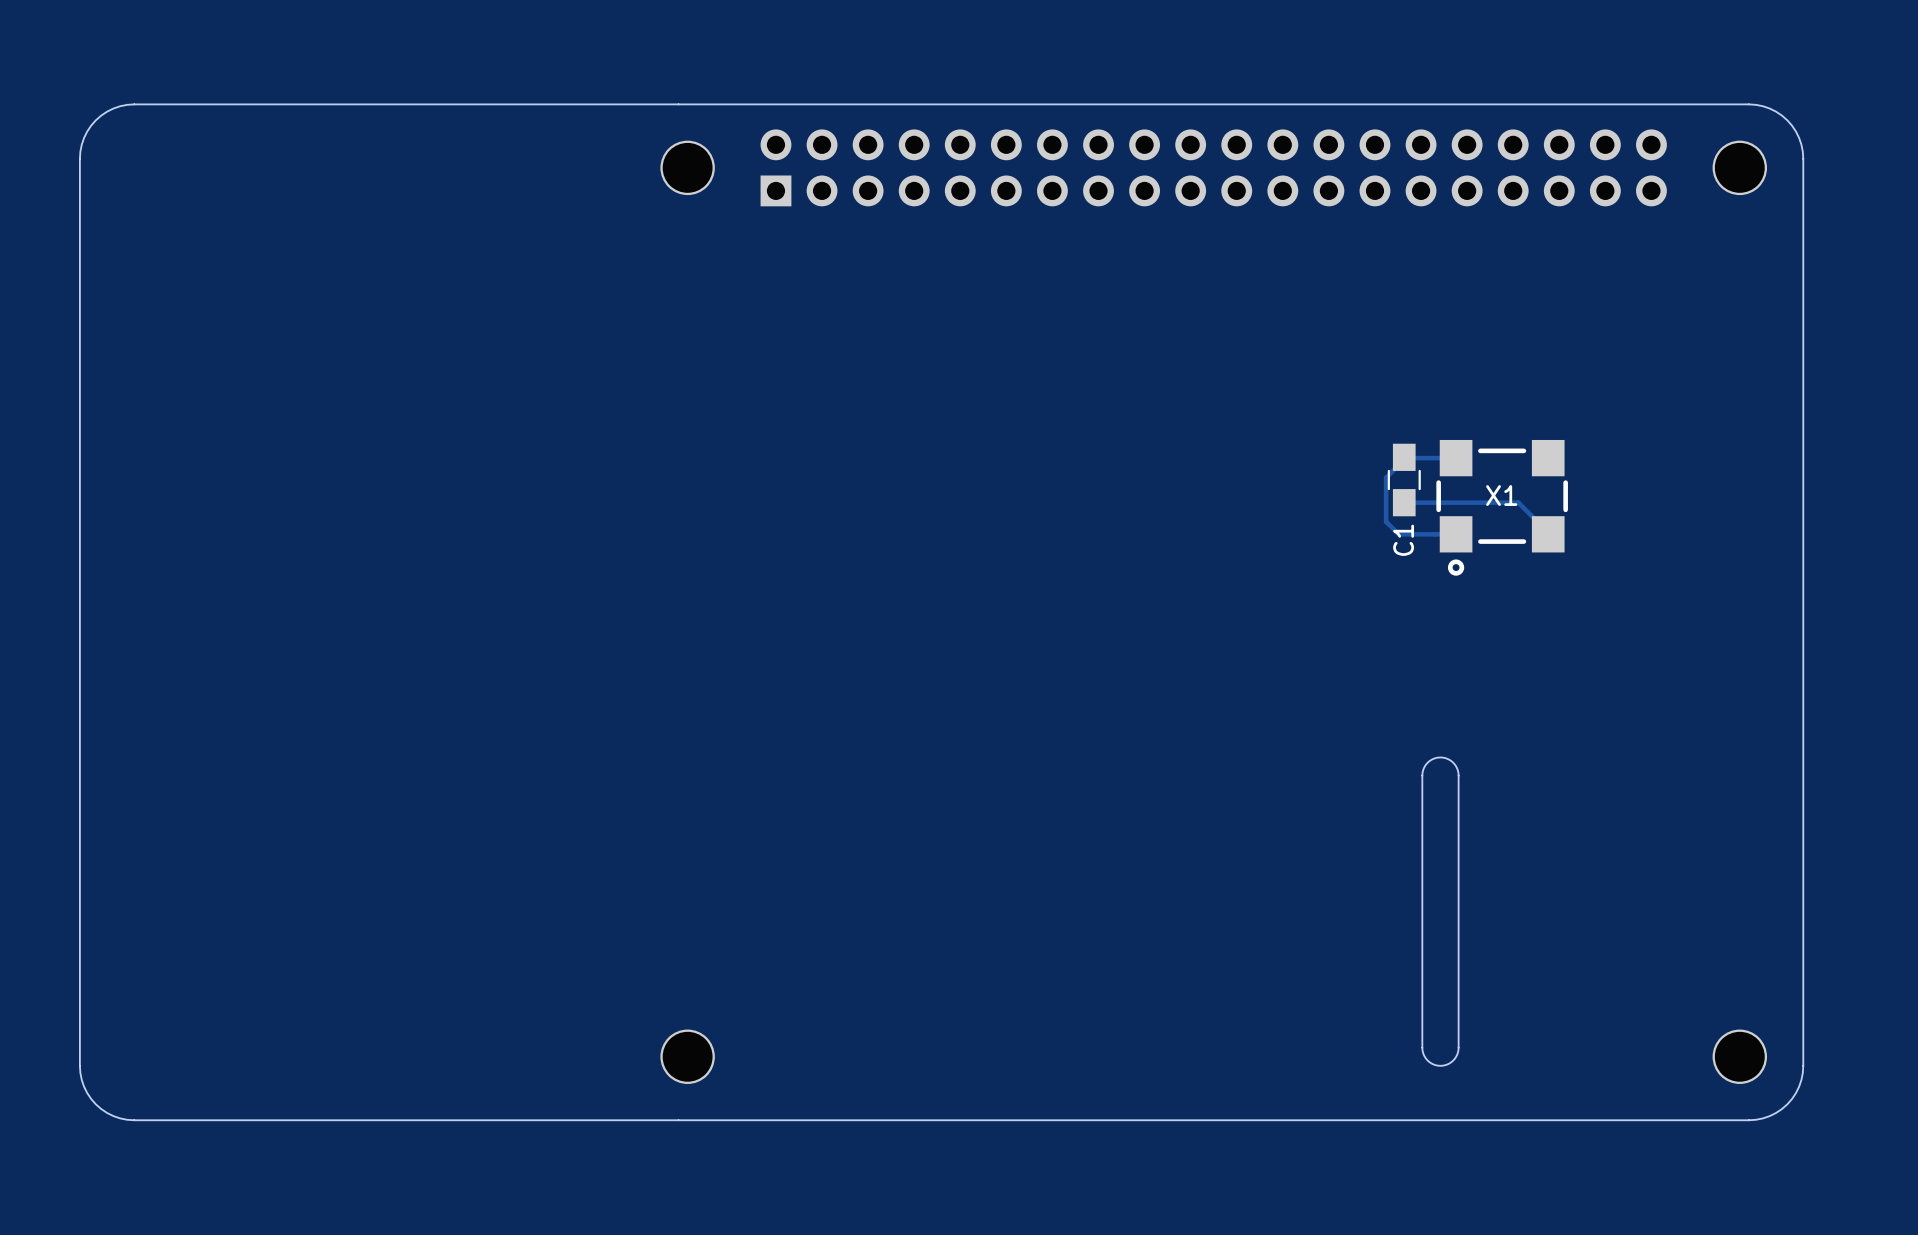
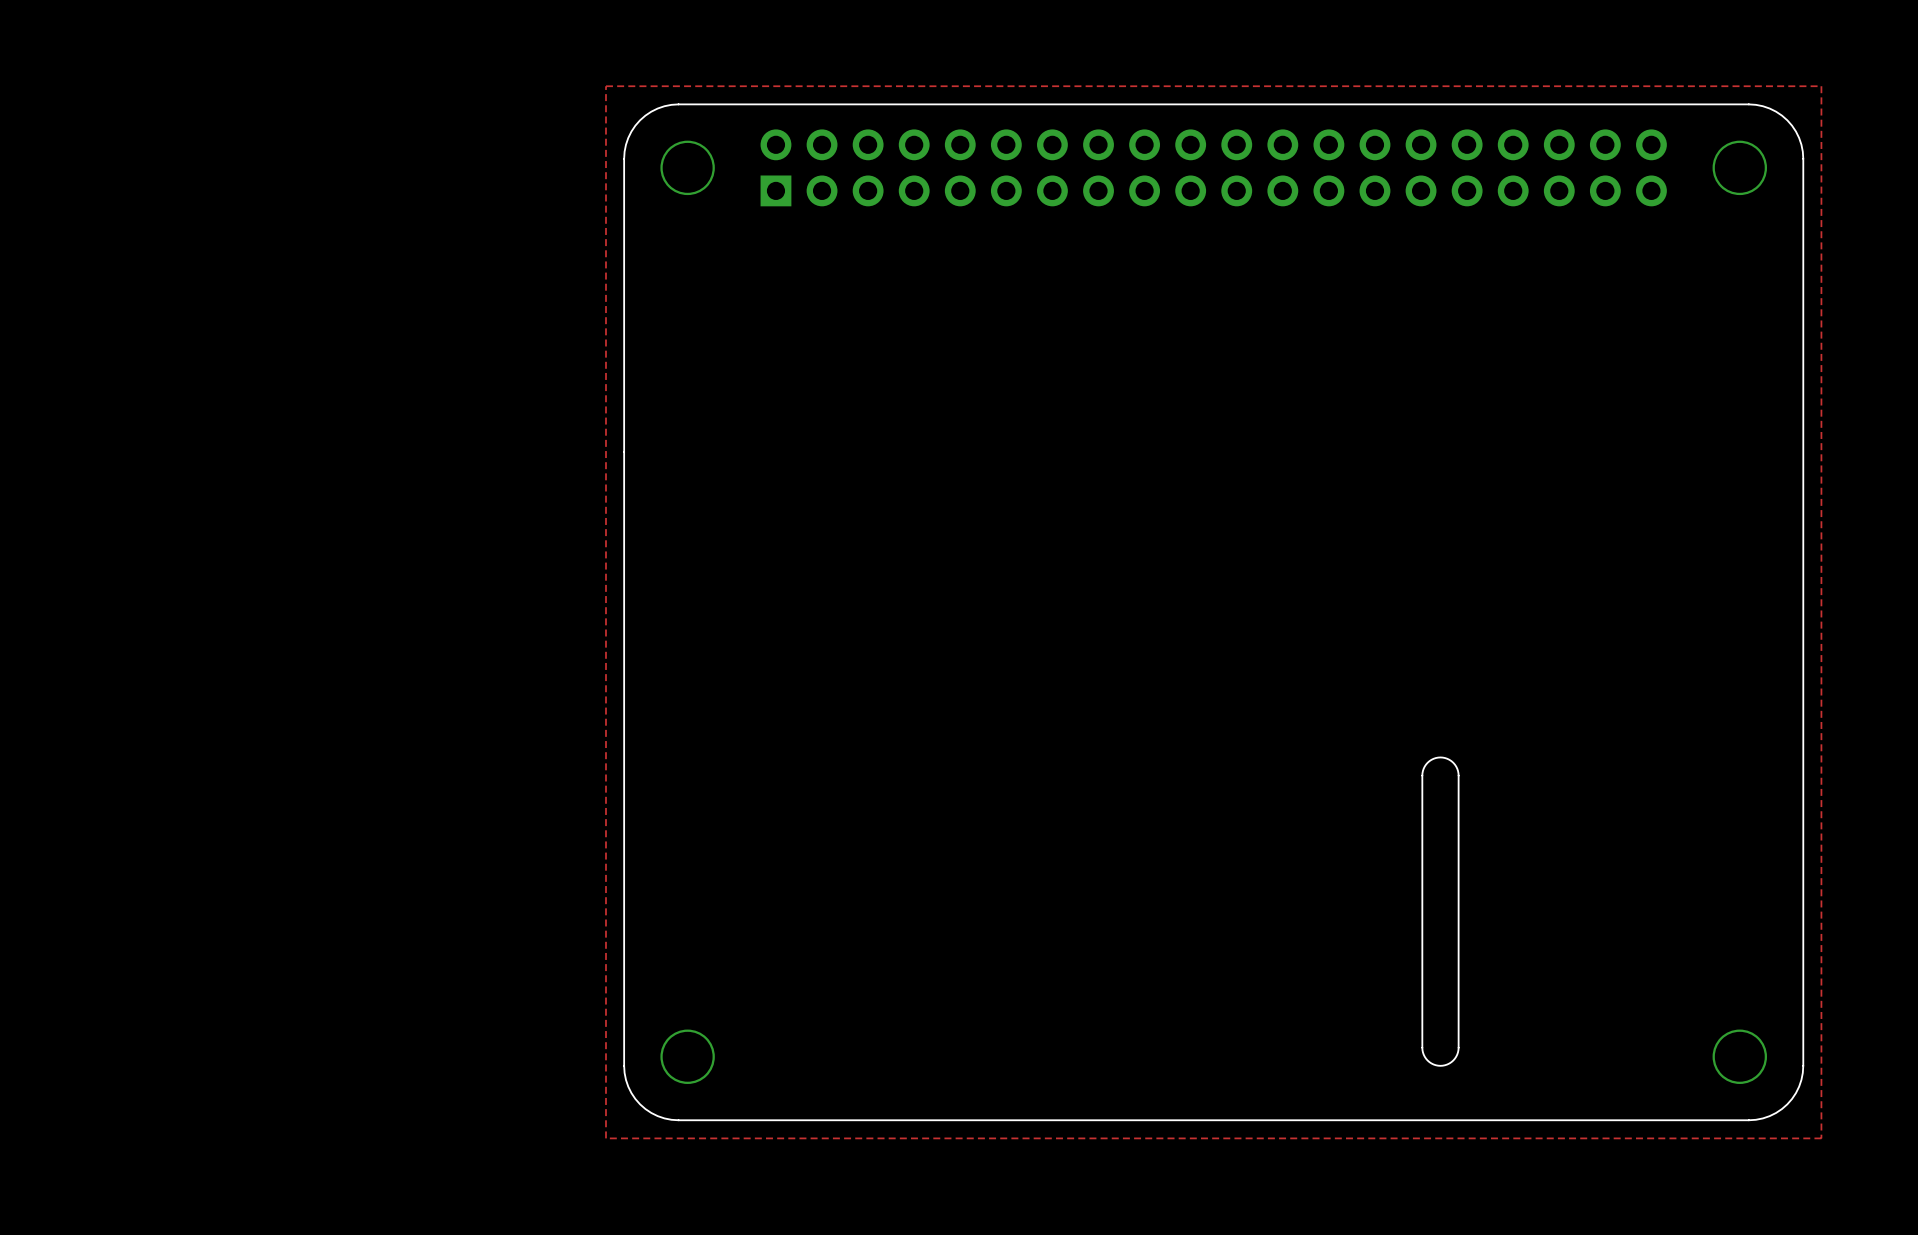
zone outline: none -> (605, 86) (1821, 86) (1821, 1138) (605, 1138) (605, 86)
board edge: (678, 104) (127, 104) (107, 111) (91, 125) (84, 137) (79, 158) (79, 1065) (81, 1079) (87, 1093) (95, 1104) (107, 1112) (120, 1118) (134, 1120) (678, 1120) -> (678, 104) (657, 108) (640, 120) (628, 137) (624, 158) (624, 1065) (628, 1086) (640, 1104) (657, 1116) (678, 1120)
track: (1456, 458) (1404, 457) (1404, 459) (1386, 477) (1386, 521) (1398, 534) (1456, 534) -> none
C1: (1404, 480) -> none
track: (1404, 502) (1518, 502) (1548, 532) (1546, 536) -> none
X1: (1502, 507) -> none

